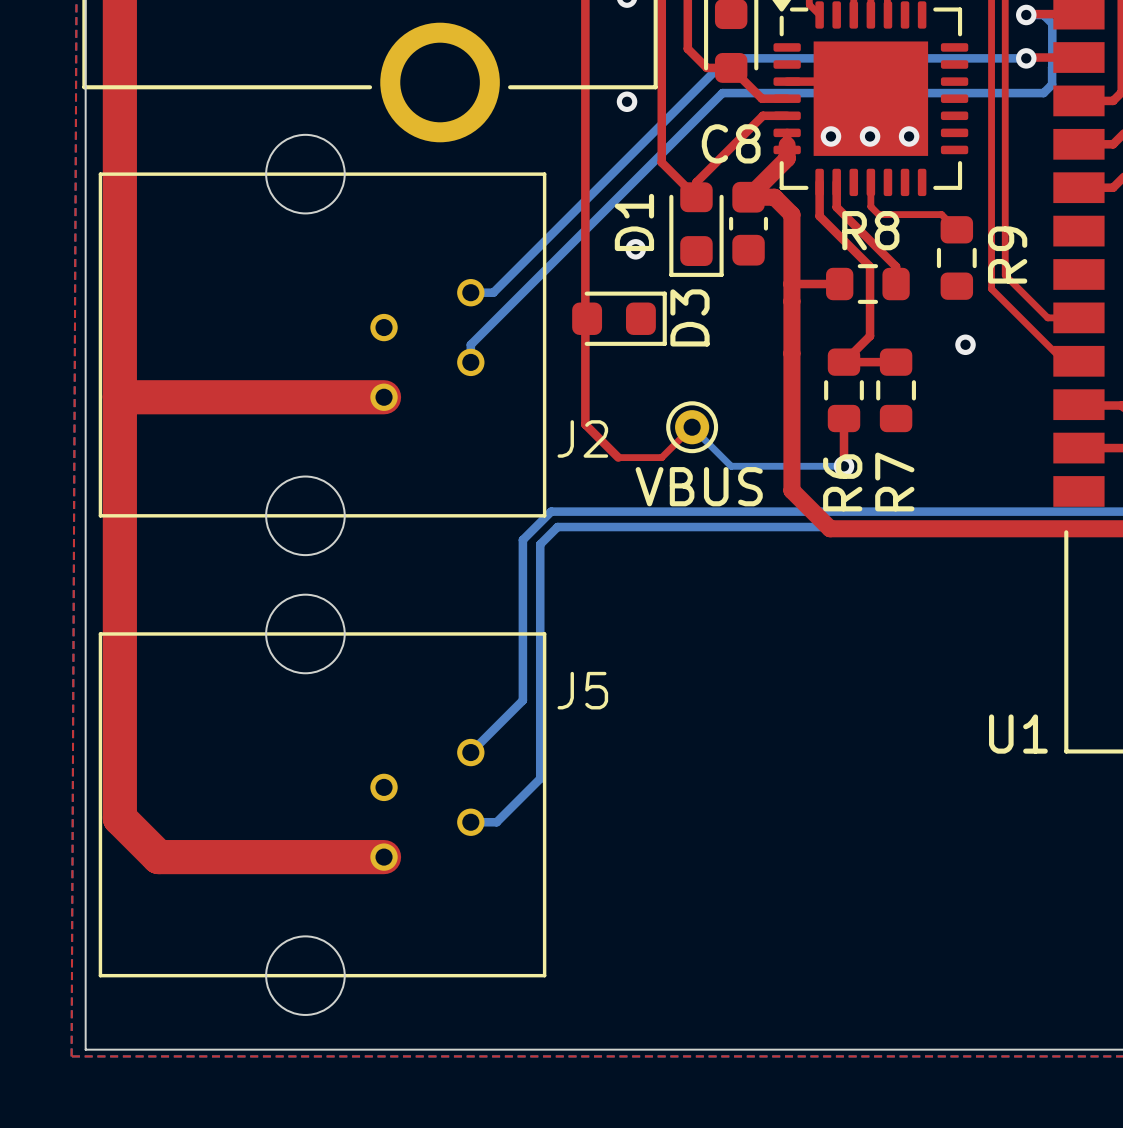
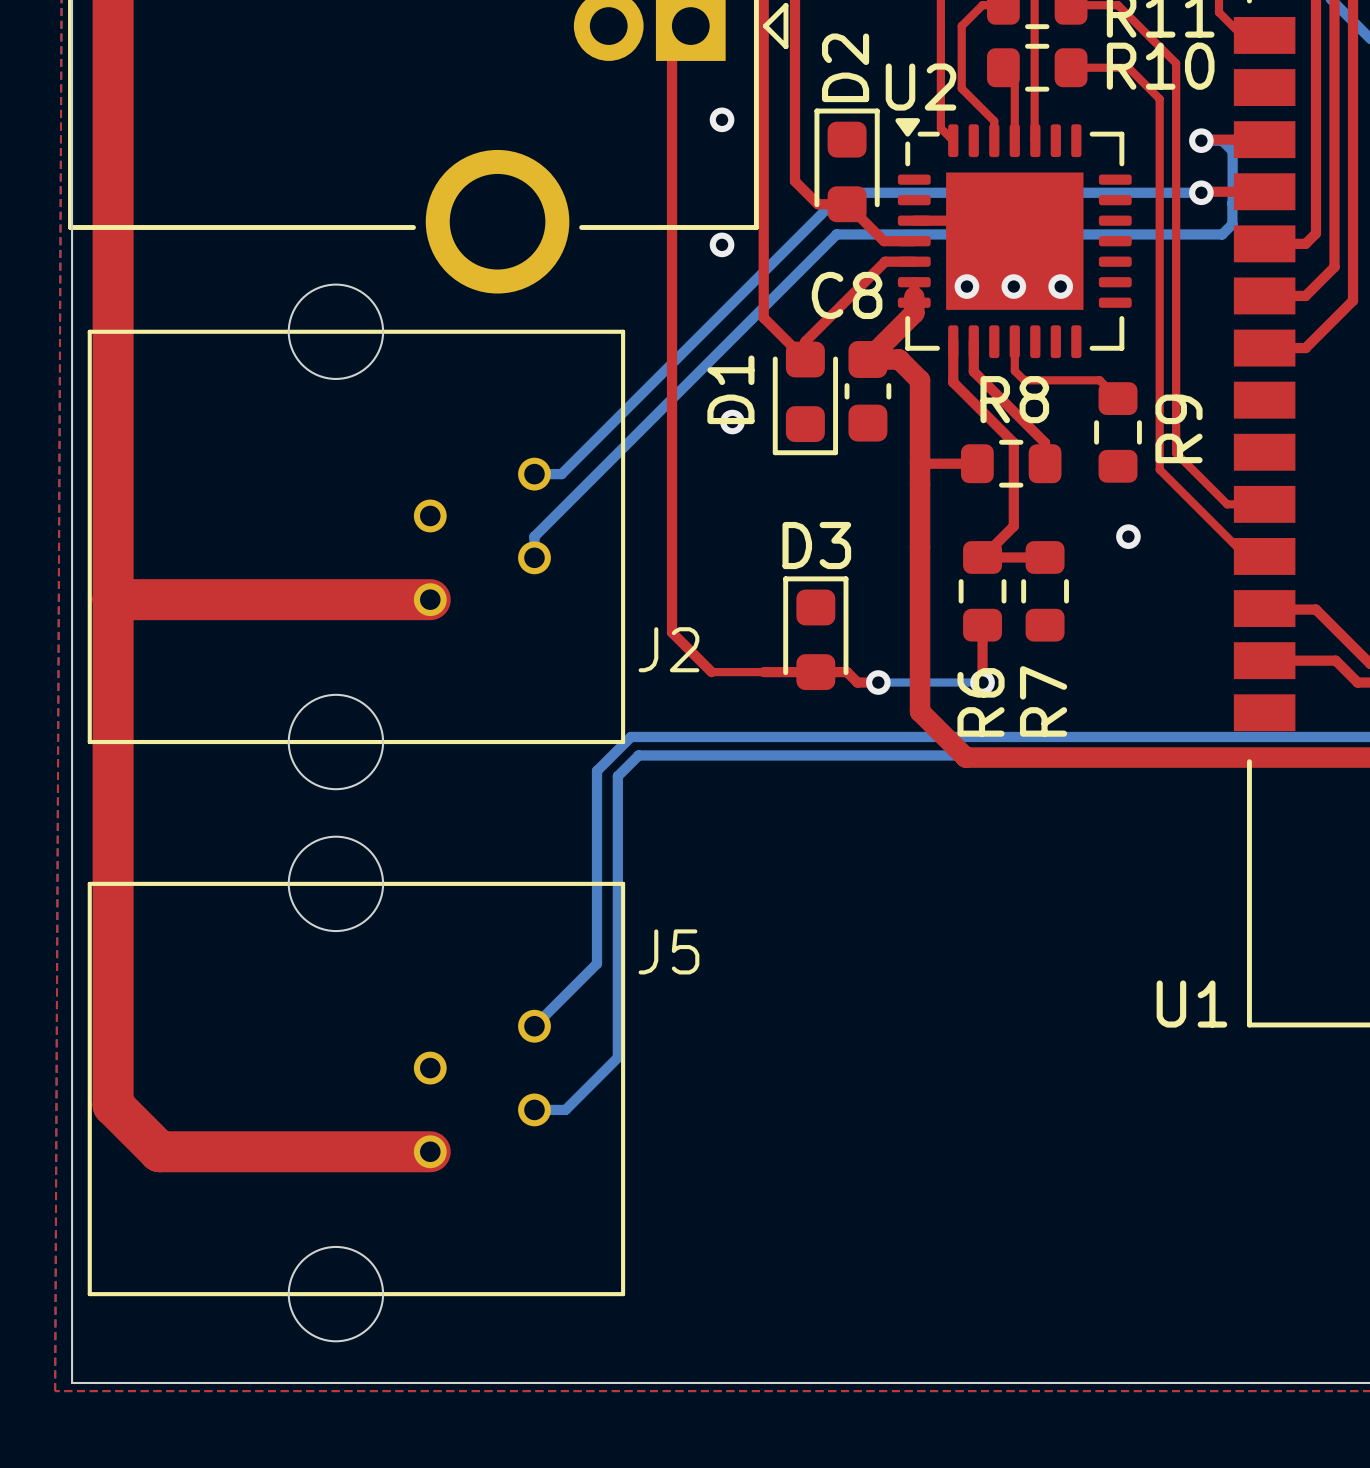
D3 rotation: 0° (619, 318) -> 90° counterclockwise (815, 633)
D3 position: (619, 318) -> (815, 633)
top track: (692, 427) (661, 457) -> (878, 682) (857, 682) (847, 672) (763, 672)
bottom track: (692, 427) (731, 466) (757, 466) -> none
part: VBUS (692, 427) -> none
via: none -> (878, 682)

